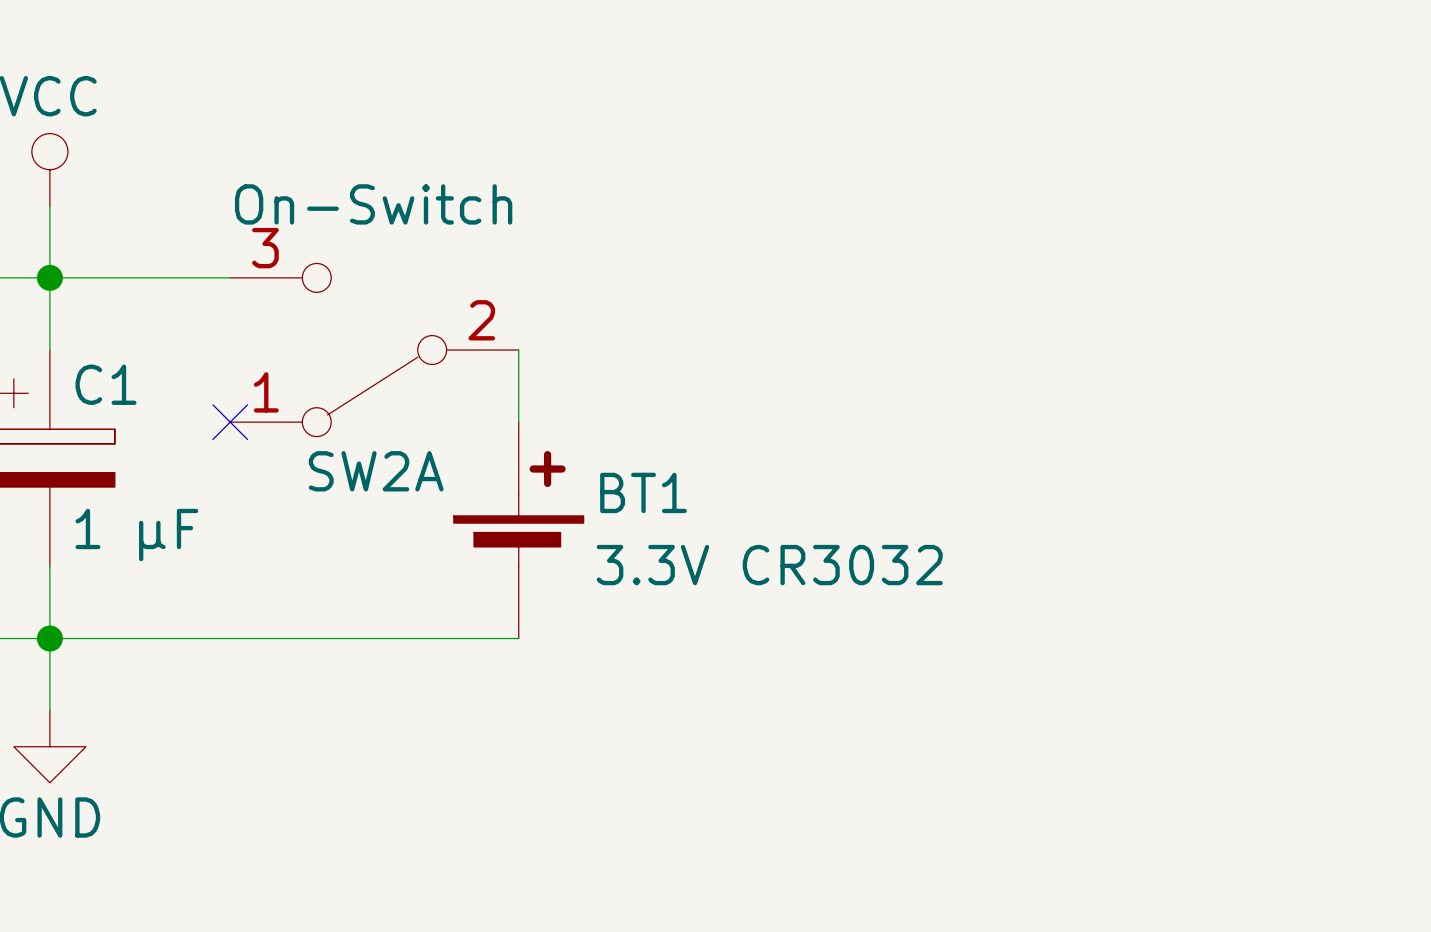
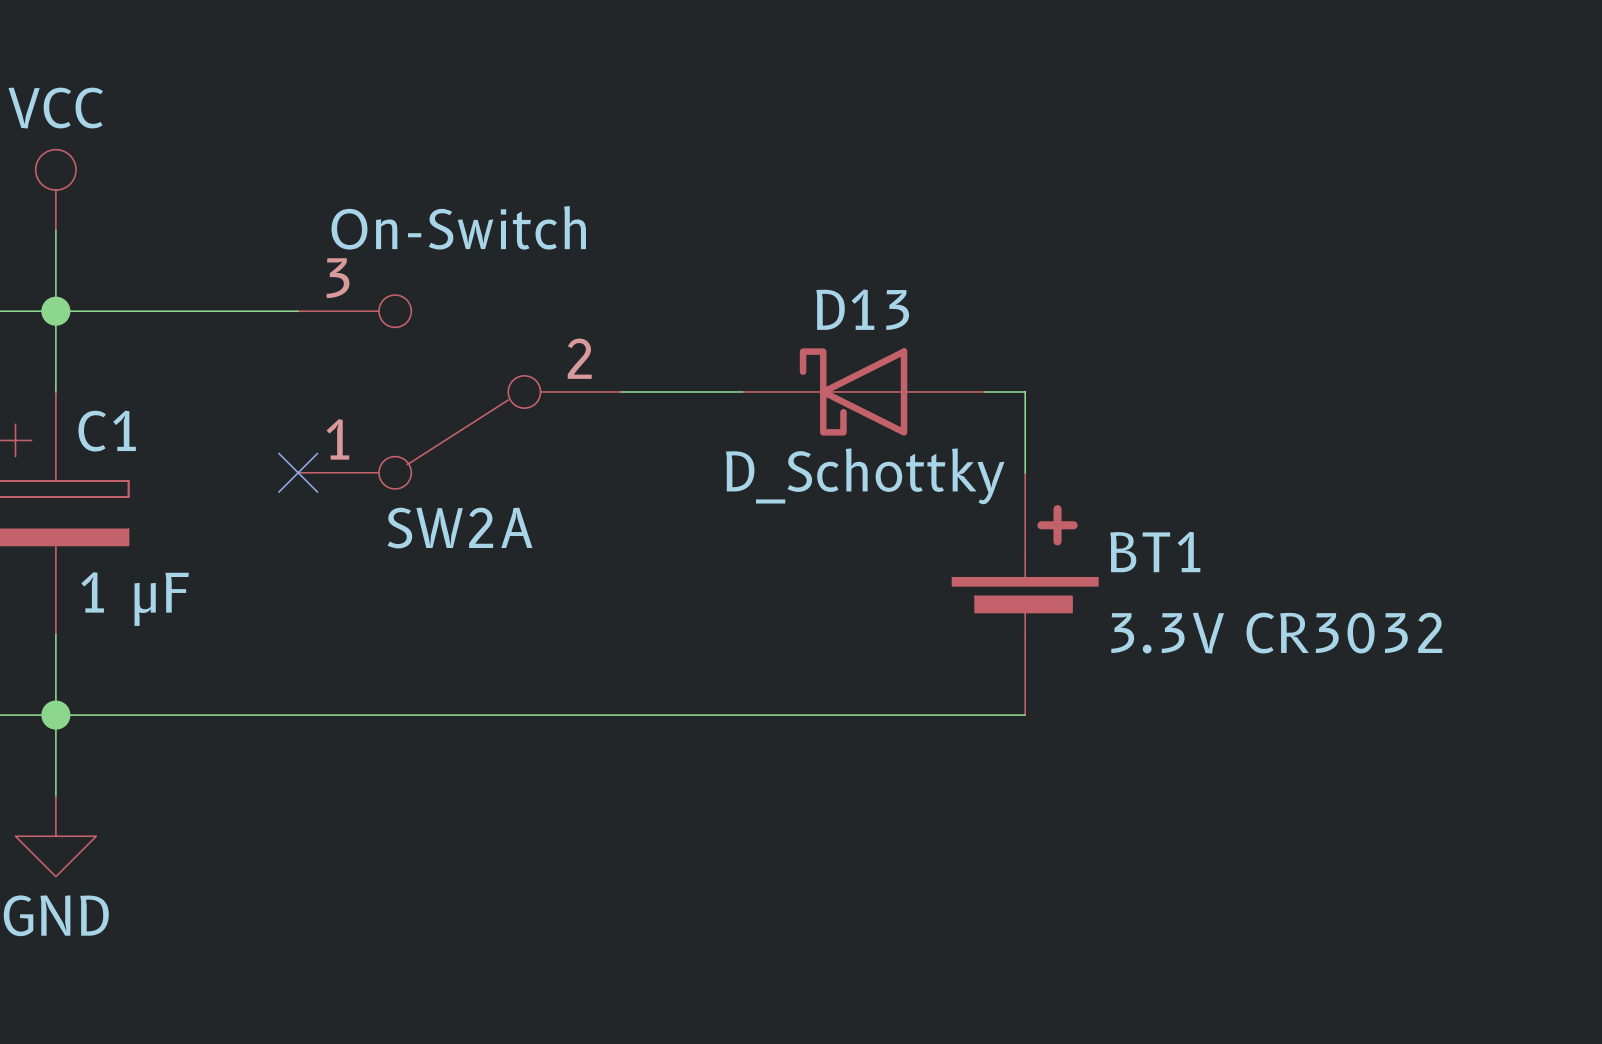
SW2A position: (374, 350) -> (459, 391)
wire: (518, 350) (518, 422) -> none
wire: none -> (621, 391) (742, 391)
D13: none -> D_Schottky (863, 391)
wire: none -> (984, 391) (1025, 391) (1025, 472)
no-connect mark position: (230, 422) -> (298, 472)
BT1 position: (518, 530) -> (1025, 593)
wire: none -> (580, 715) (1025, 715)

